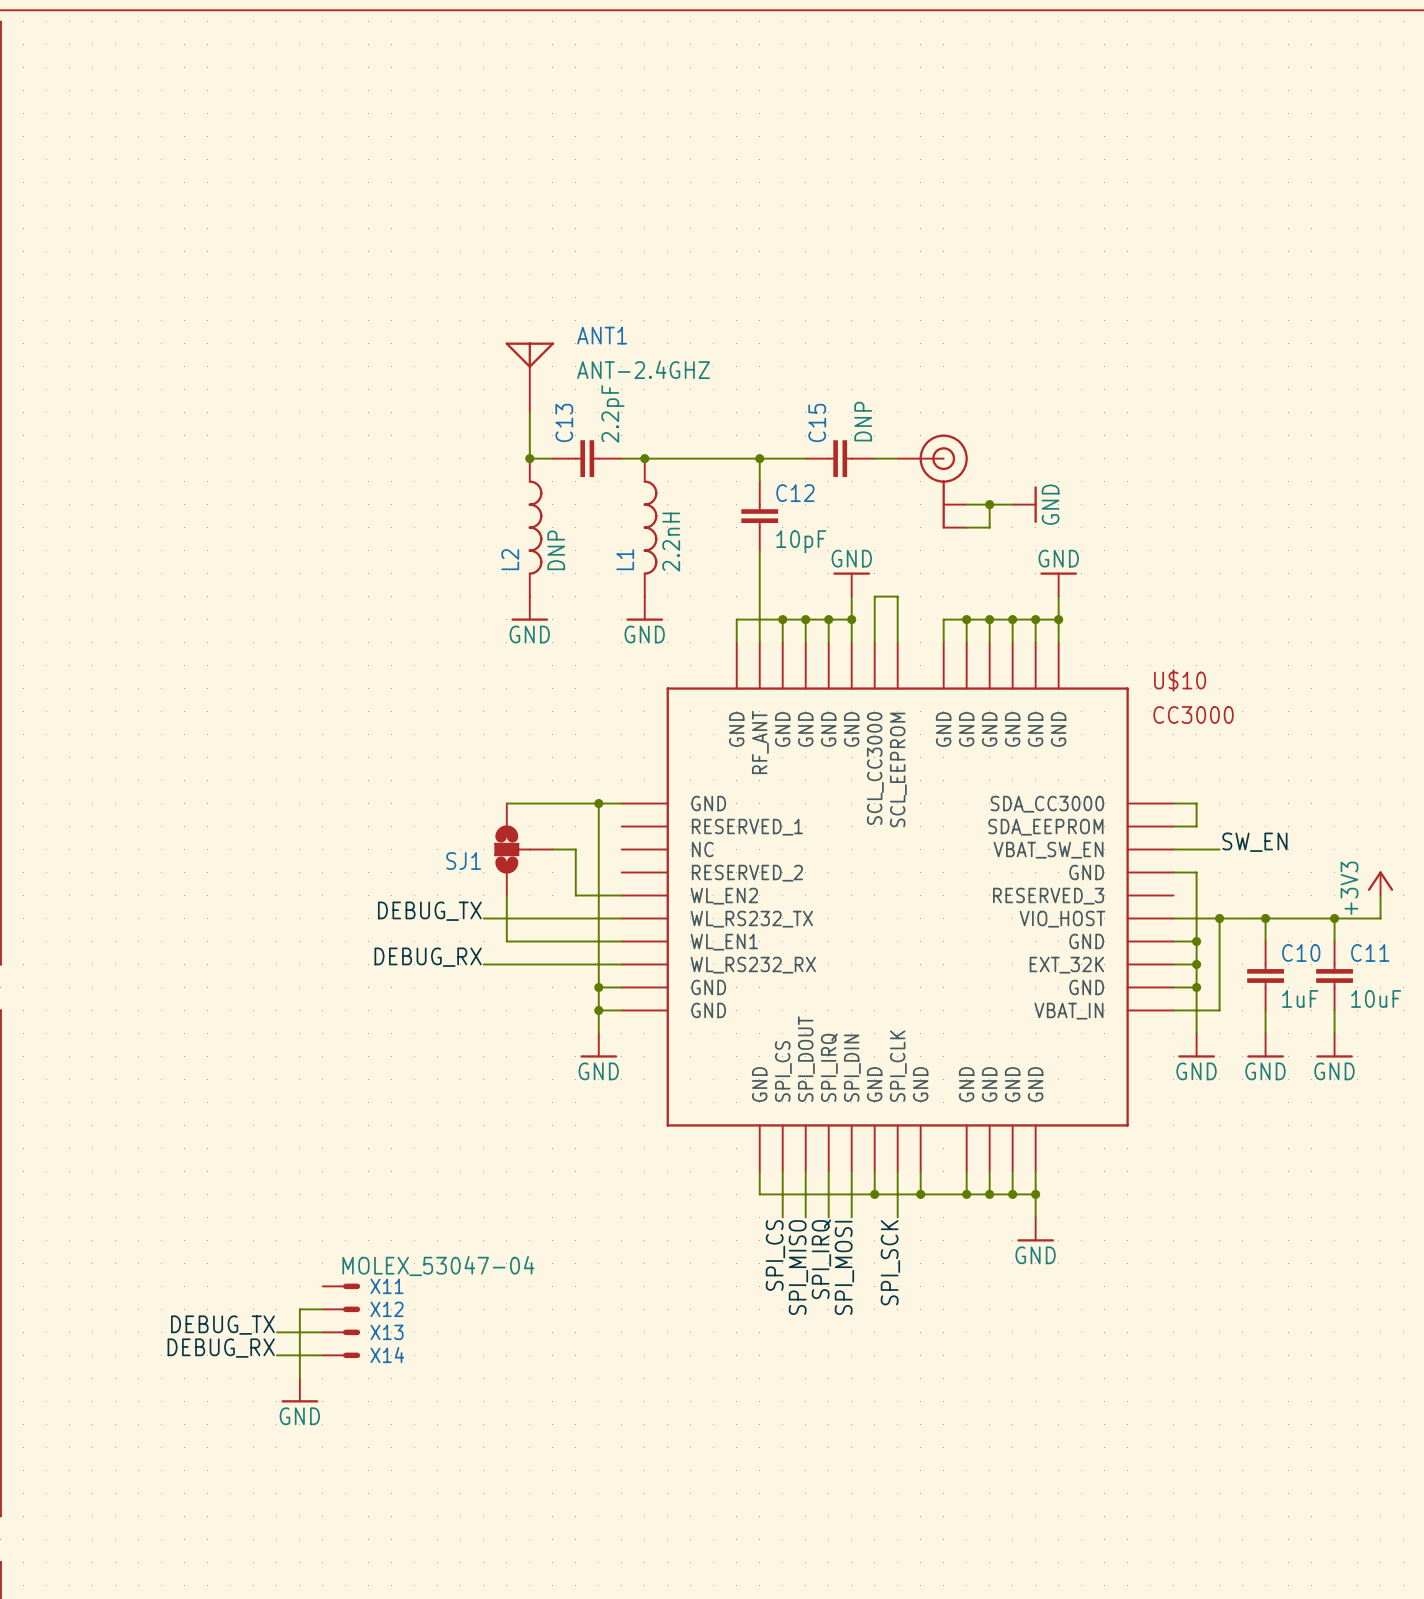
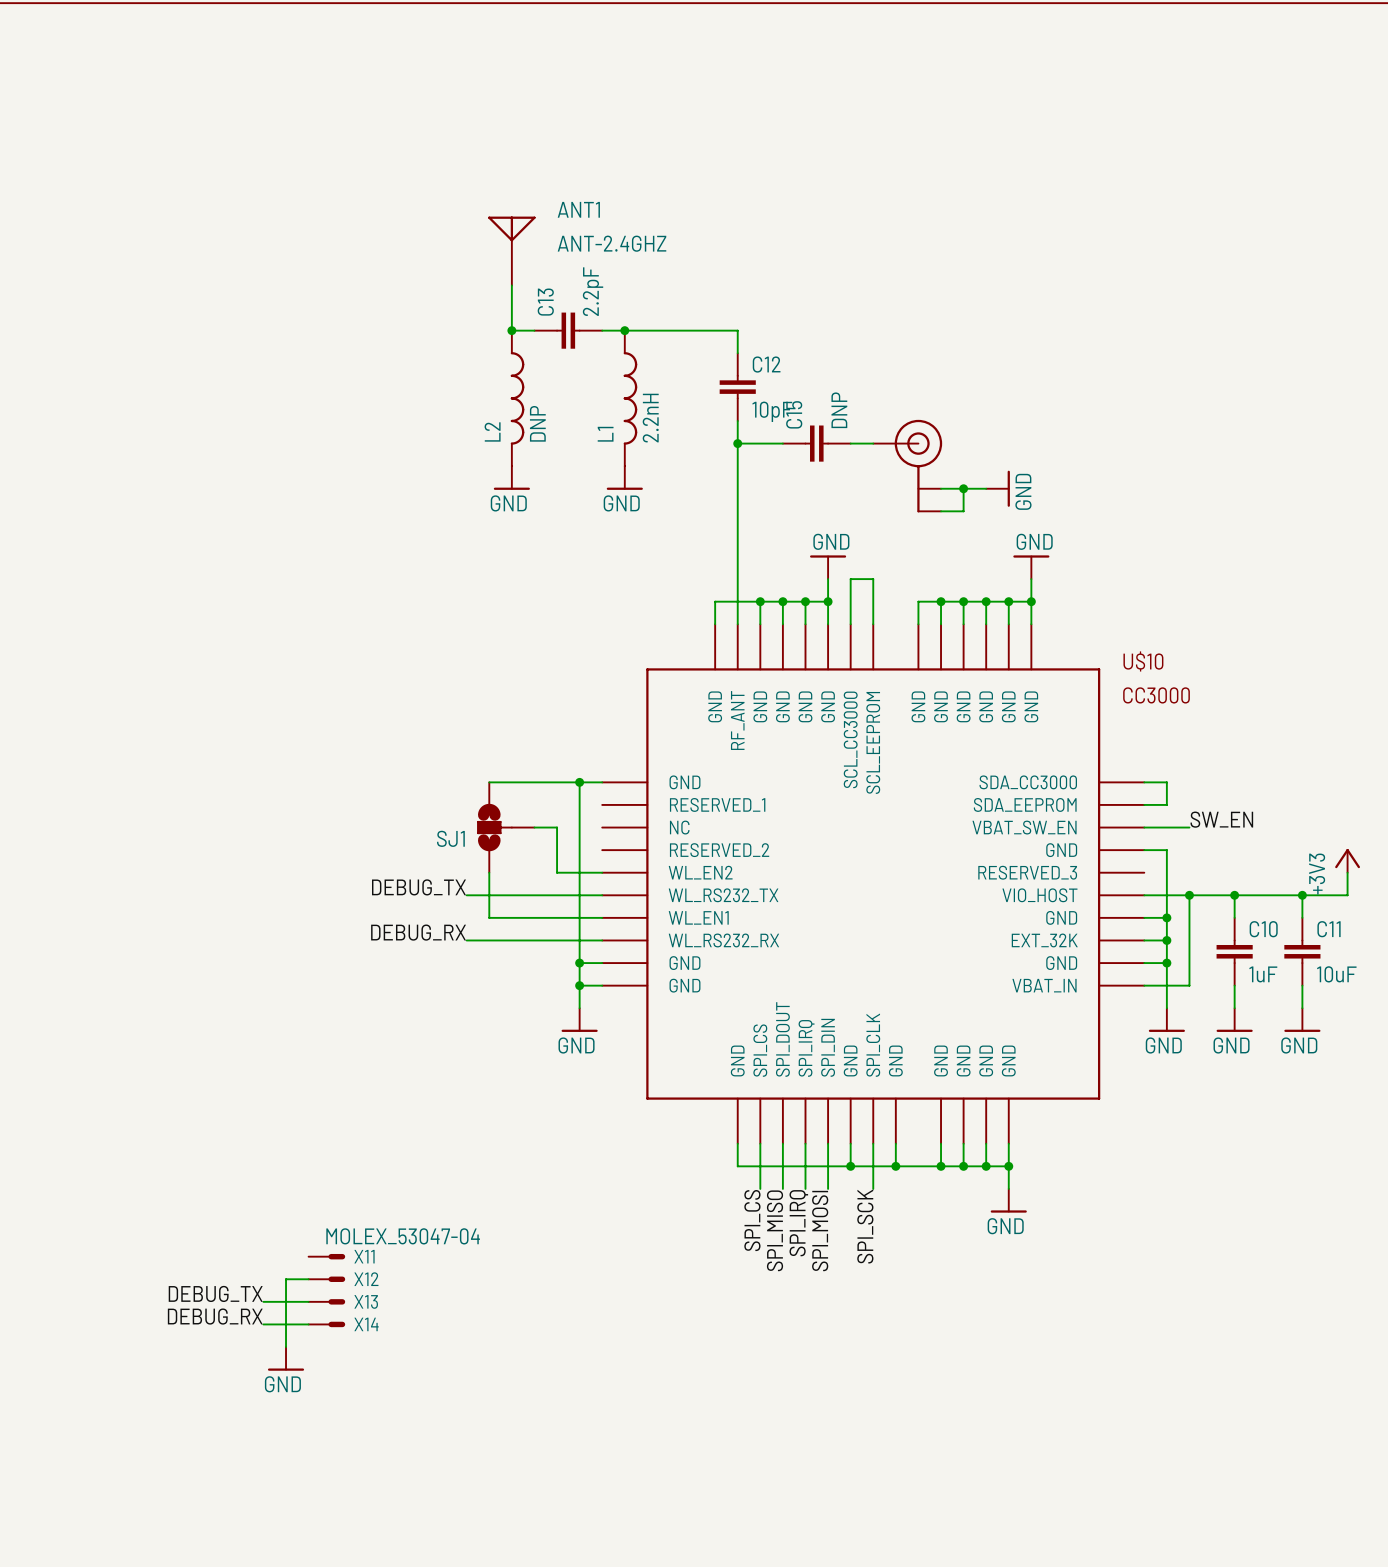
junction: none -> (511, 330)
wire: none -> (602, 330) (737, 330) (737, 353)
junction: none -> (624, 330)
ANT1 position: (529, 377) -> (511, 251)
wire: (529, 412) (529, 458) (552, 458) -> (511, 285) (511, 330) (534, 330)
junction: (529, 458) -> none
C13 position: (587, 458) -> (568, 330)
wire: (621, 458) (759, 458) -> (737, 420) (737, 443)
junction: (644, 458) -> none
power symbol: none -> GND (511, 478)
power symbol: none -> GND (624, 478)
C12 position: (759, 516) -> (737, 387)
L2 position: (535, 527) -> (517, 398)
L1 position: (650, 527) -> (630, 398)
power symbol: GND (529, 608) -> none
power symbol: GND (644, 608) -> none

